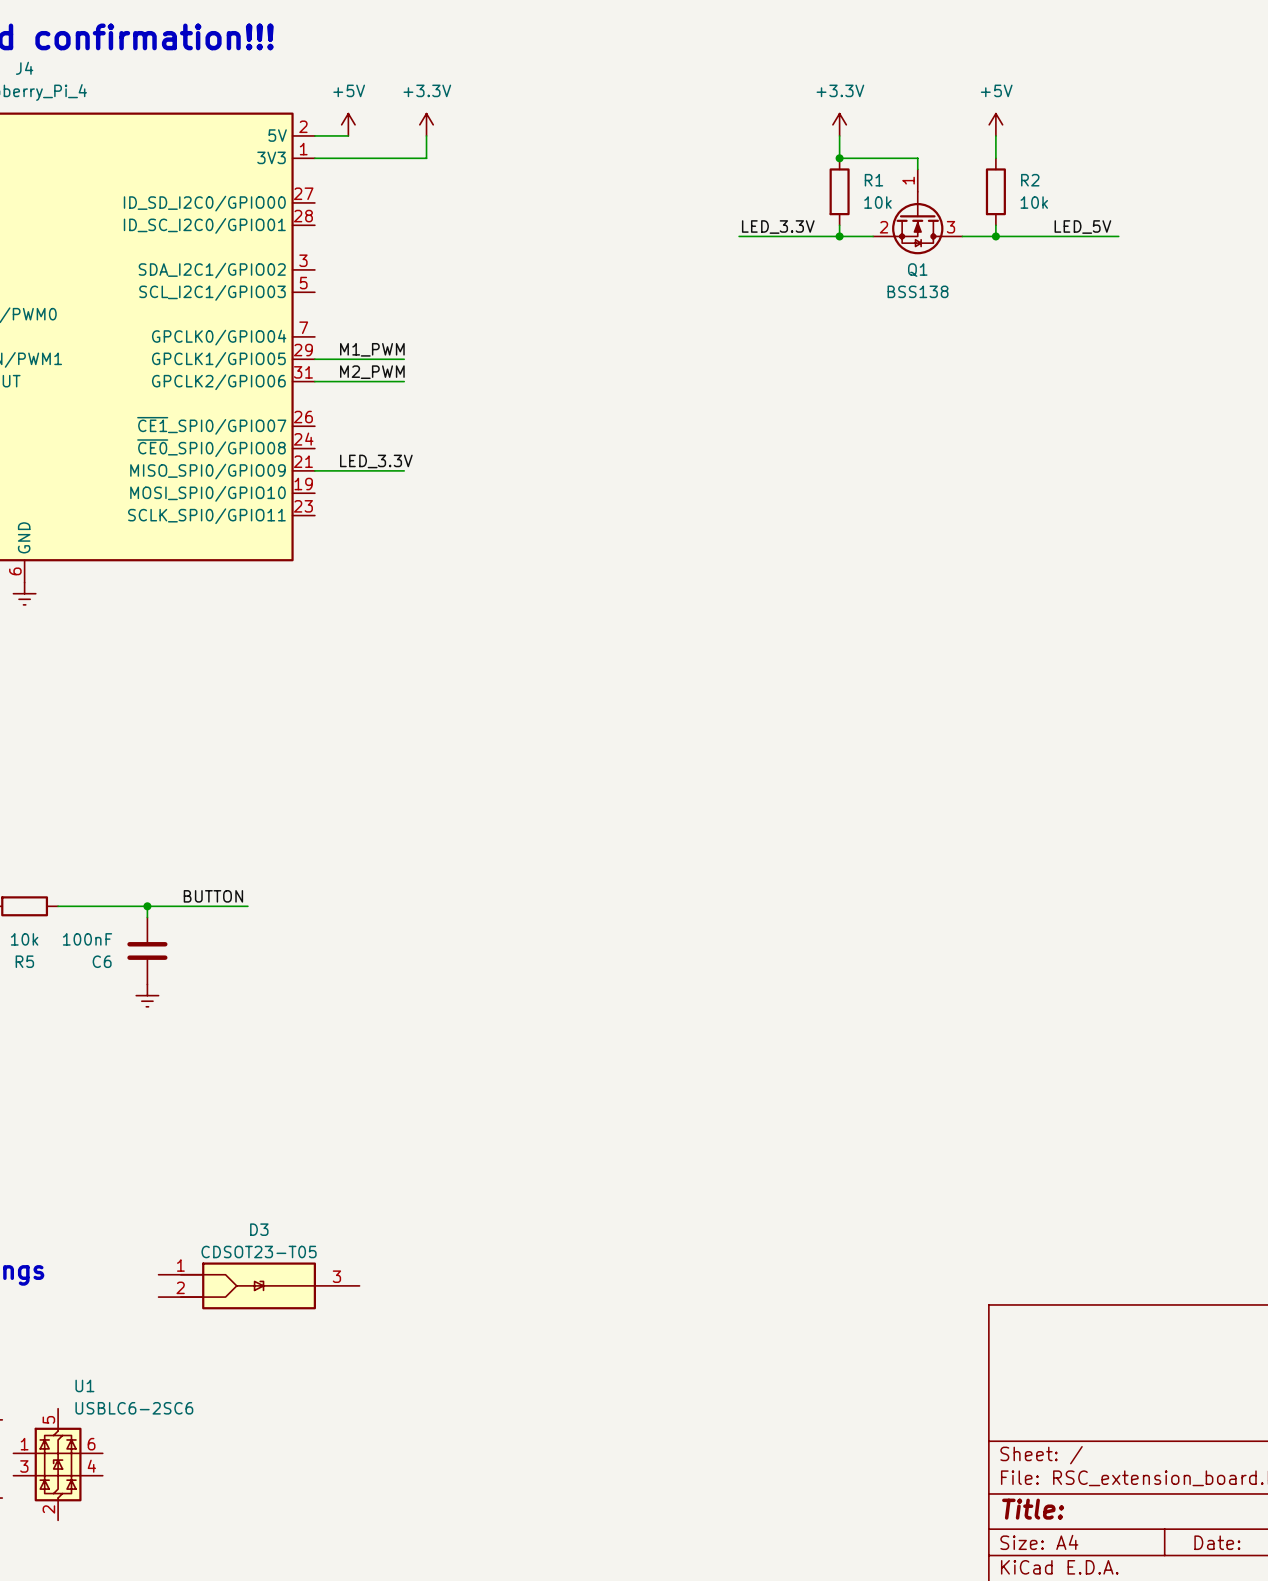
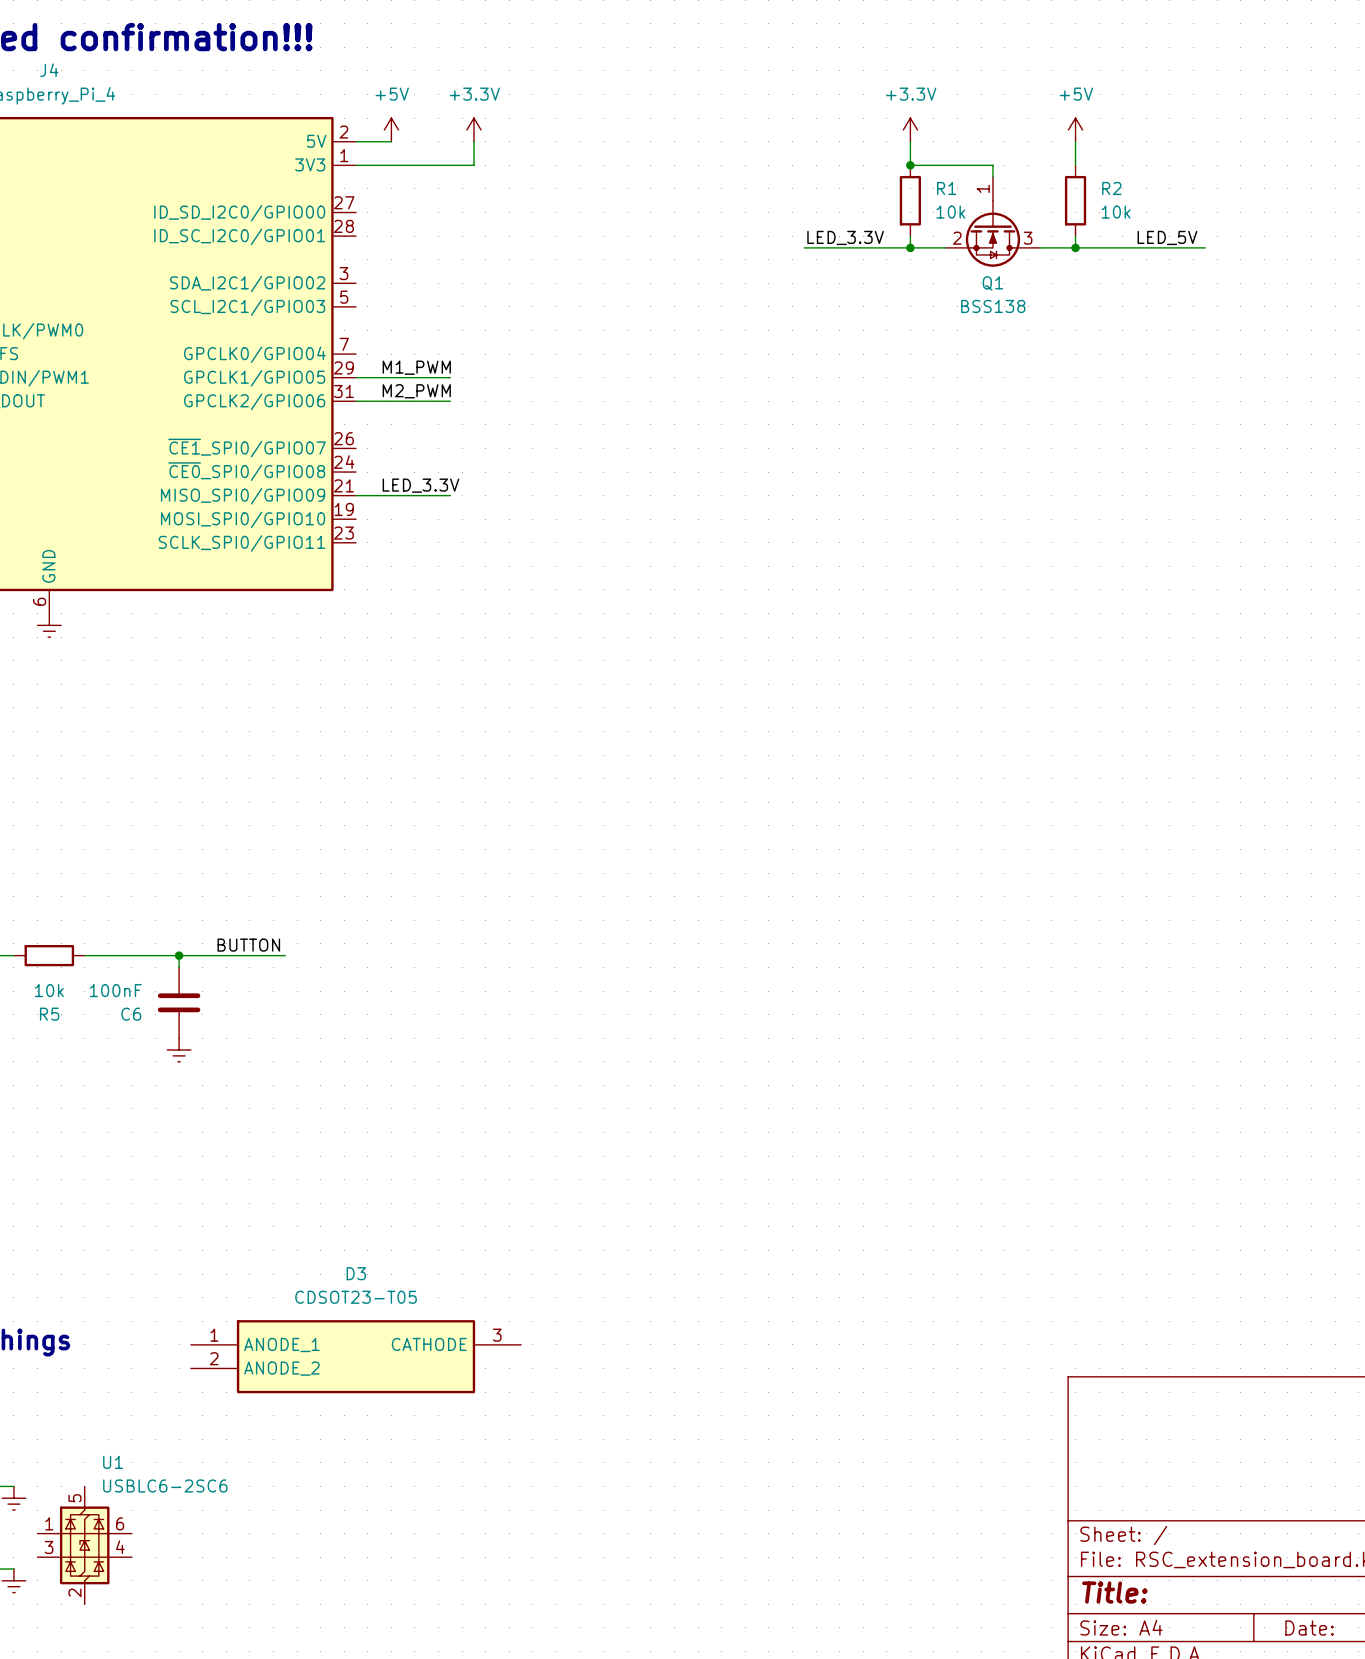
D3 name position: D3 (259, 1229) -> D3 (356, 1273)
D3 value position: CDSOT23-T05 (259, 1251) -> CDSOT23-T05 (356, 1297)
D3 symbol: [158, 1262, 360, 1310] -> [190, 1320, 522, 1394]

